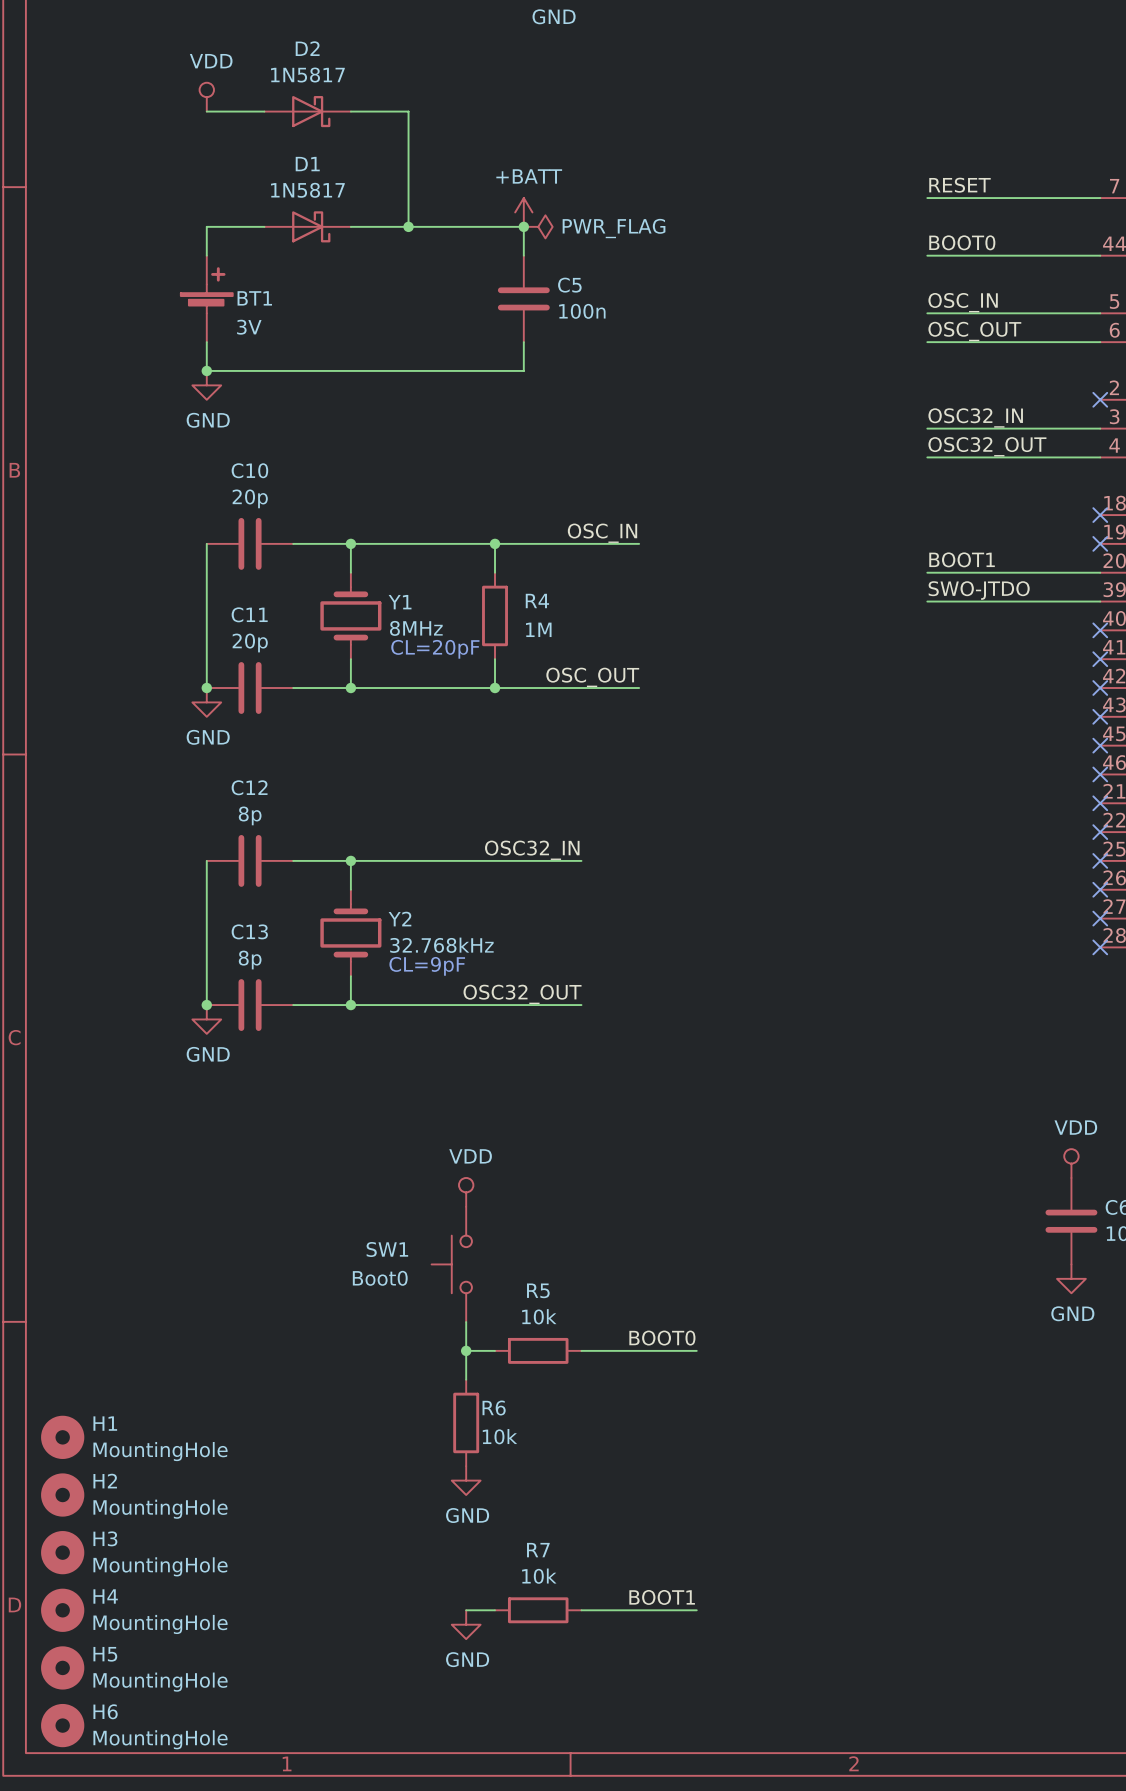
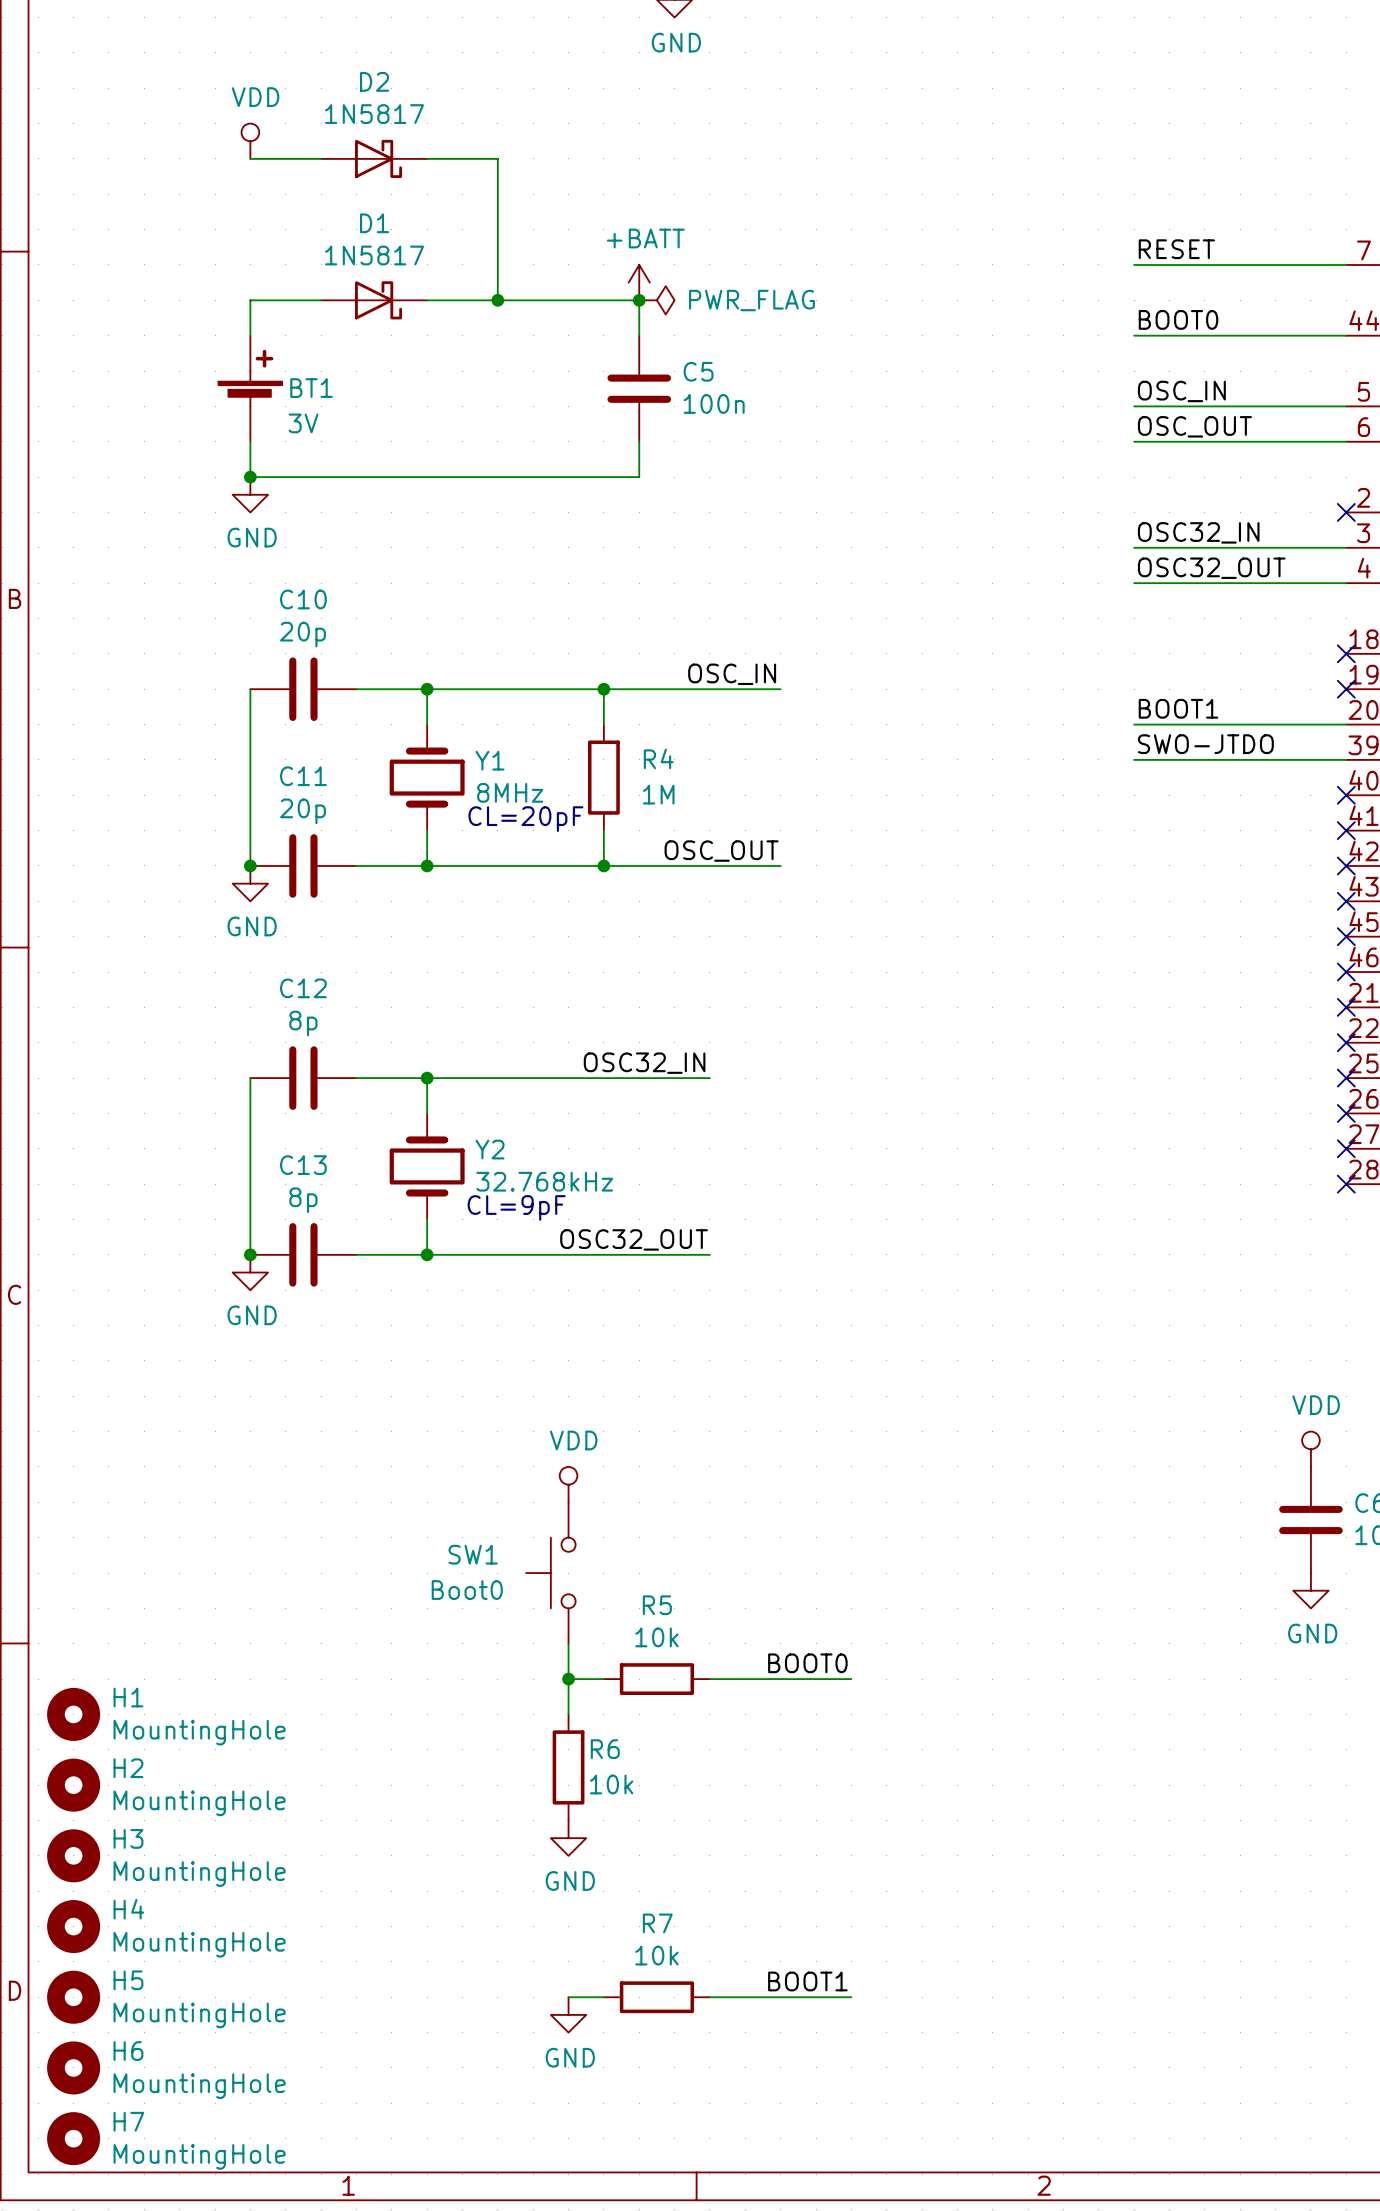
H1: none -> MountingHole (73, 1714)
H1 name: H1 (105, 1423) -> H2 (128, 1768)
H2 name: H2 (105, 1481) -> H3 (128, 1838)
H3 name: H3 (105, 1538) -> H4 (128, 1909)
H4 name: H4 (105, 1596) -> H5 (128, 1980)
H5 name: H5 (105, 1654) -> H6 (128, 2051)
H6 name: H6 (105, 1711) -> H7 (128, 2121)

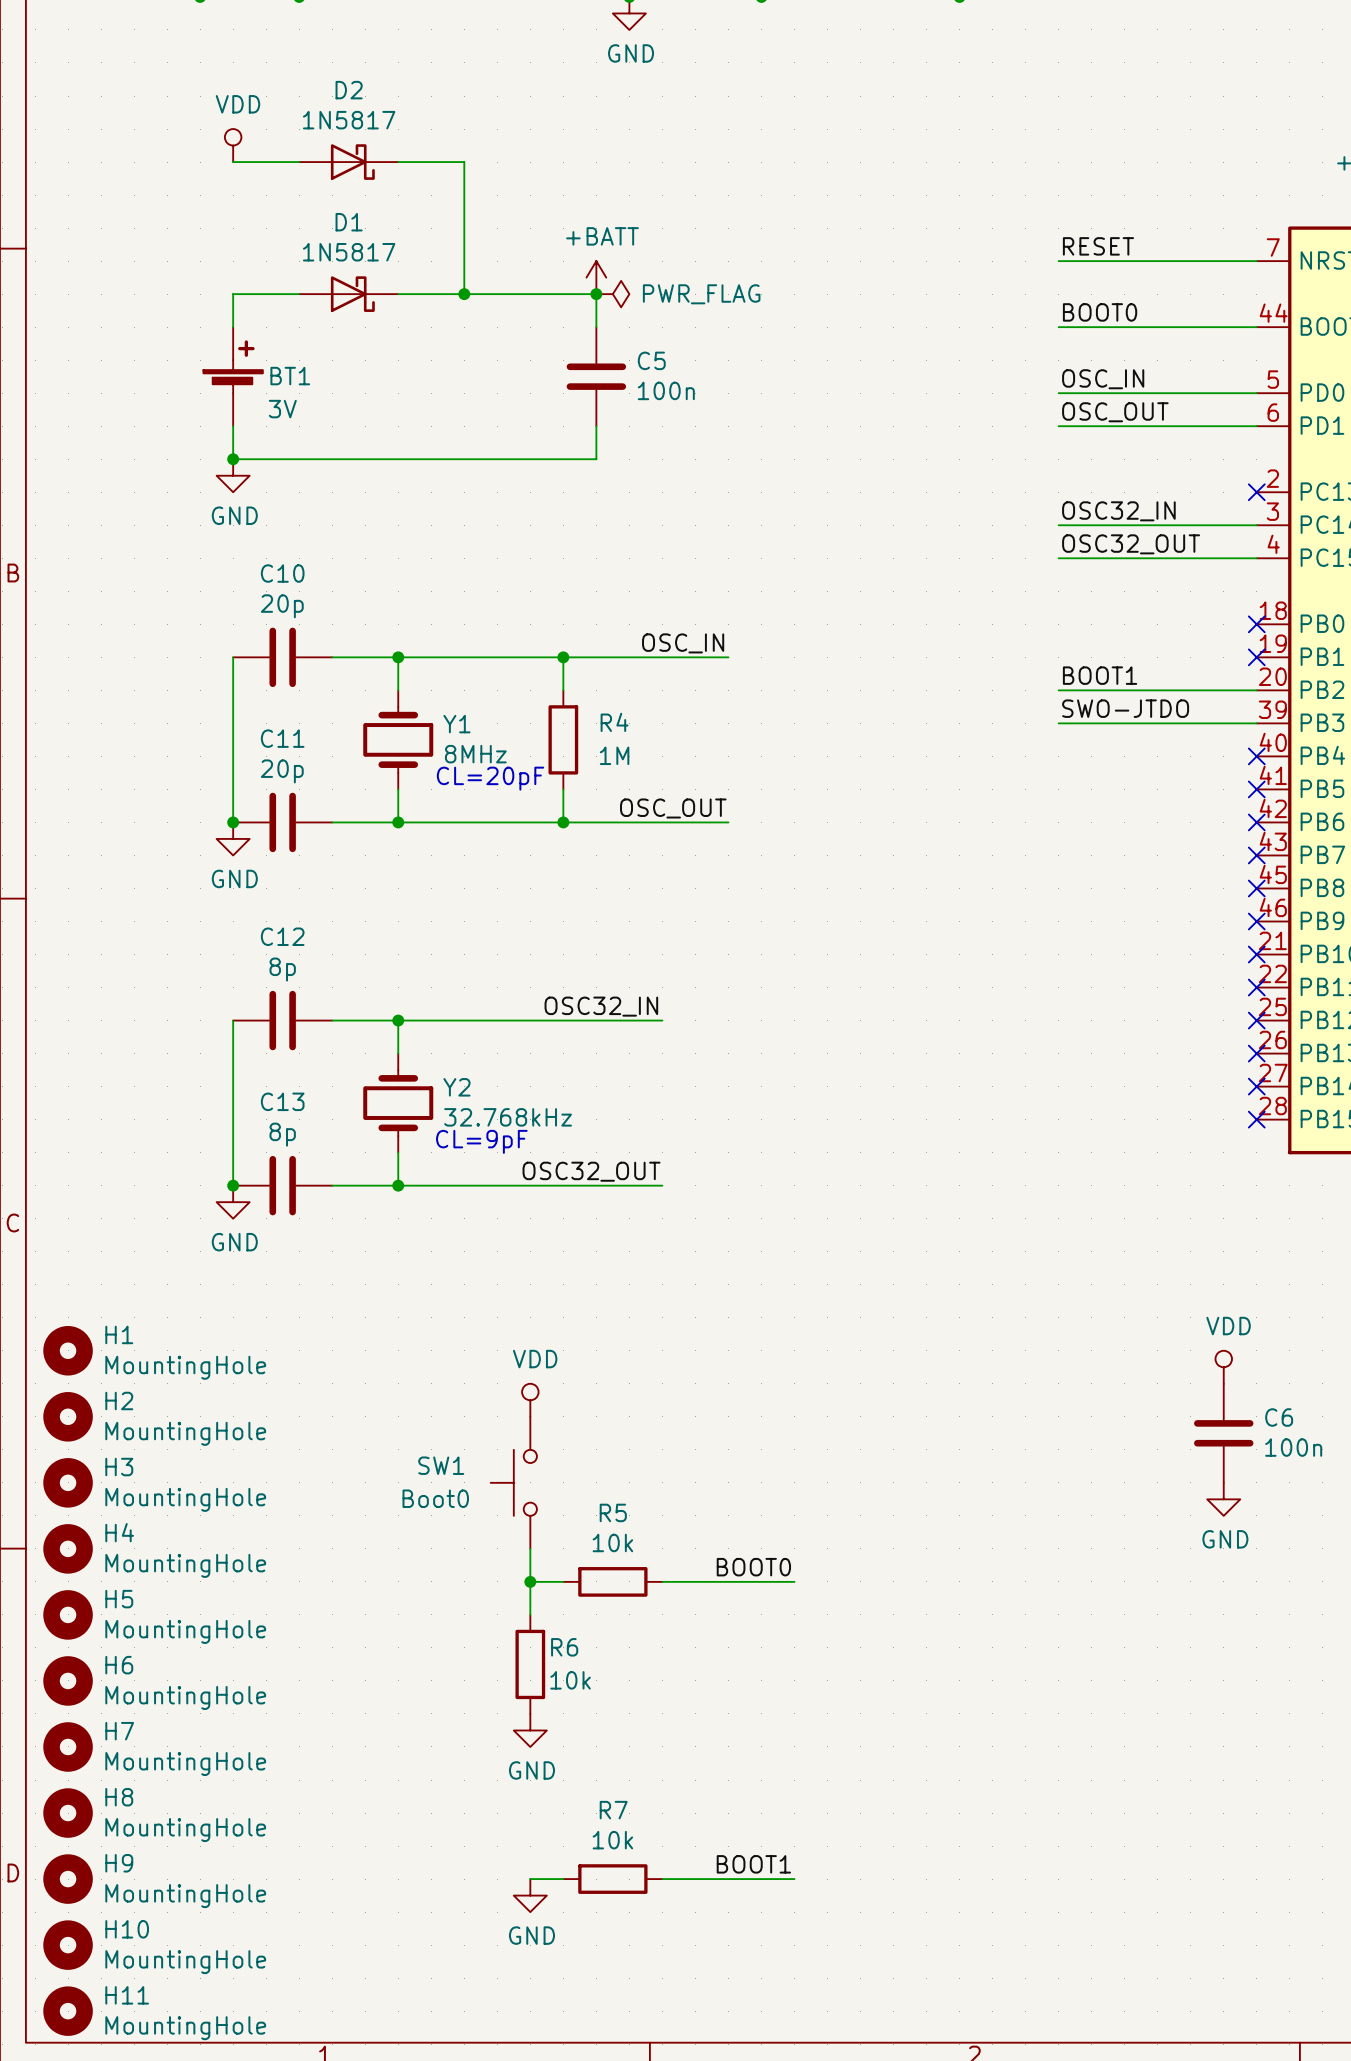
H1: none -> MountingHole (68, 1350)
H2: none -> MountingHole (68, 1416)
H3: none -> MountingHole (68, 1482)
H4: none -> MountingHole (68, 1548)
H1 name: H1 (128, 1697) -> H5 (119, 1599)
H2 name: H2 (128, 1768) -> H6 (119, 1665)
H3 name: H3 (128, 1838) -> H7 (119, 1731)
H4 name: H4 (128, 1909) -> H8 (119, 1797)
H5 name: H5 (128, 1980) -> H9 (119, 1863)
H6 name: H6 (128, 2051) -> H10 (127, 1929)
H7 name: H7 (128, 2121) -> H11 (127, 1995)

